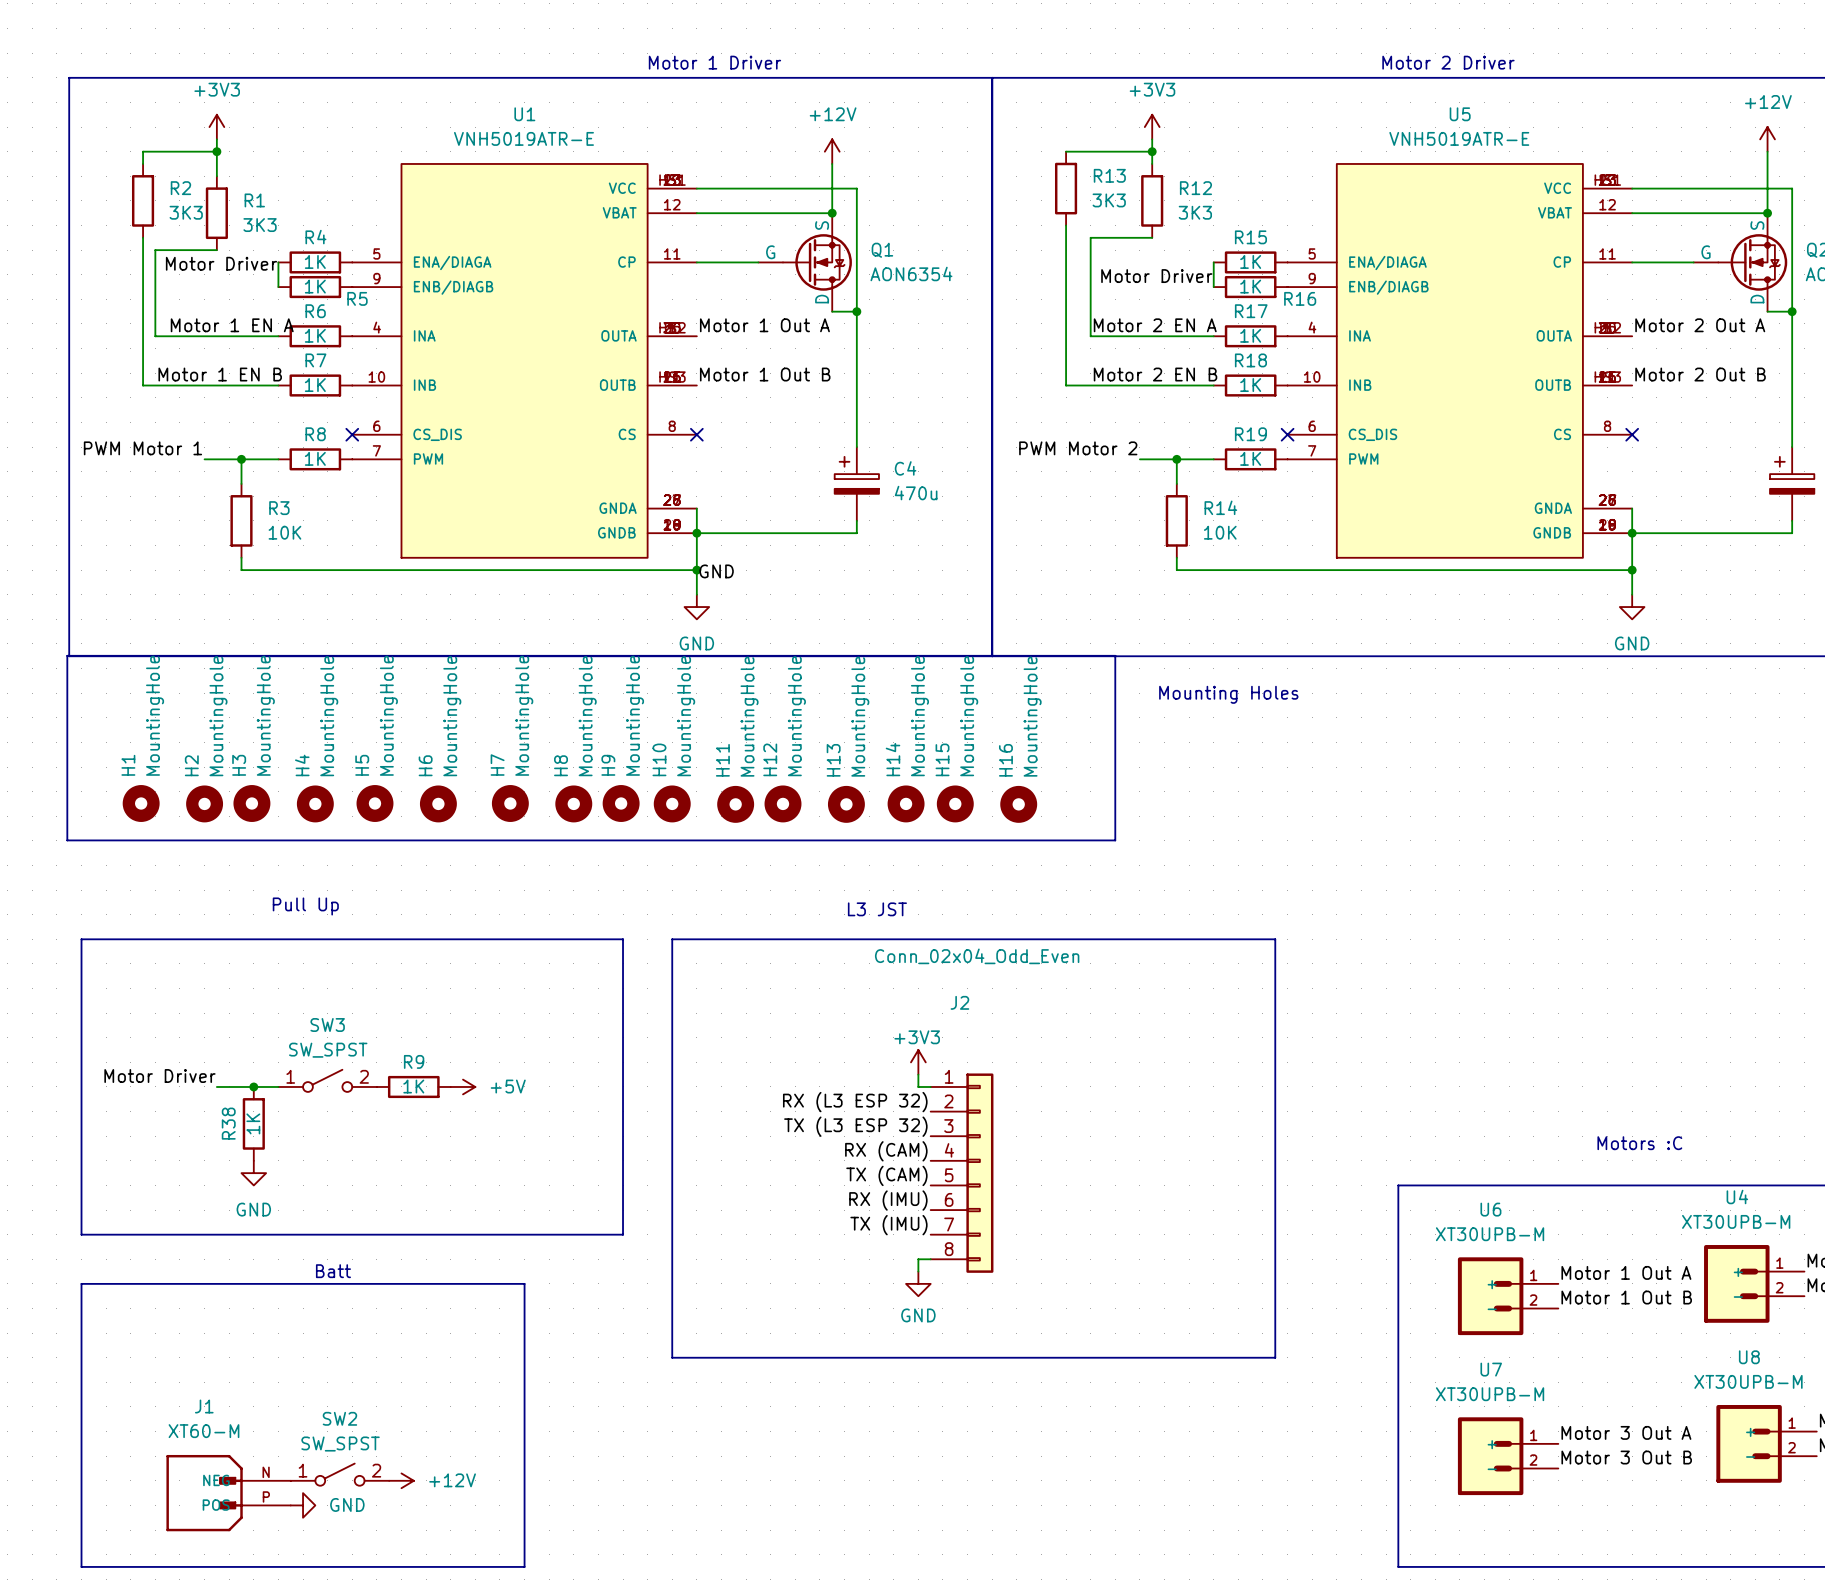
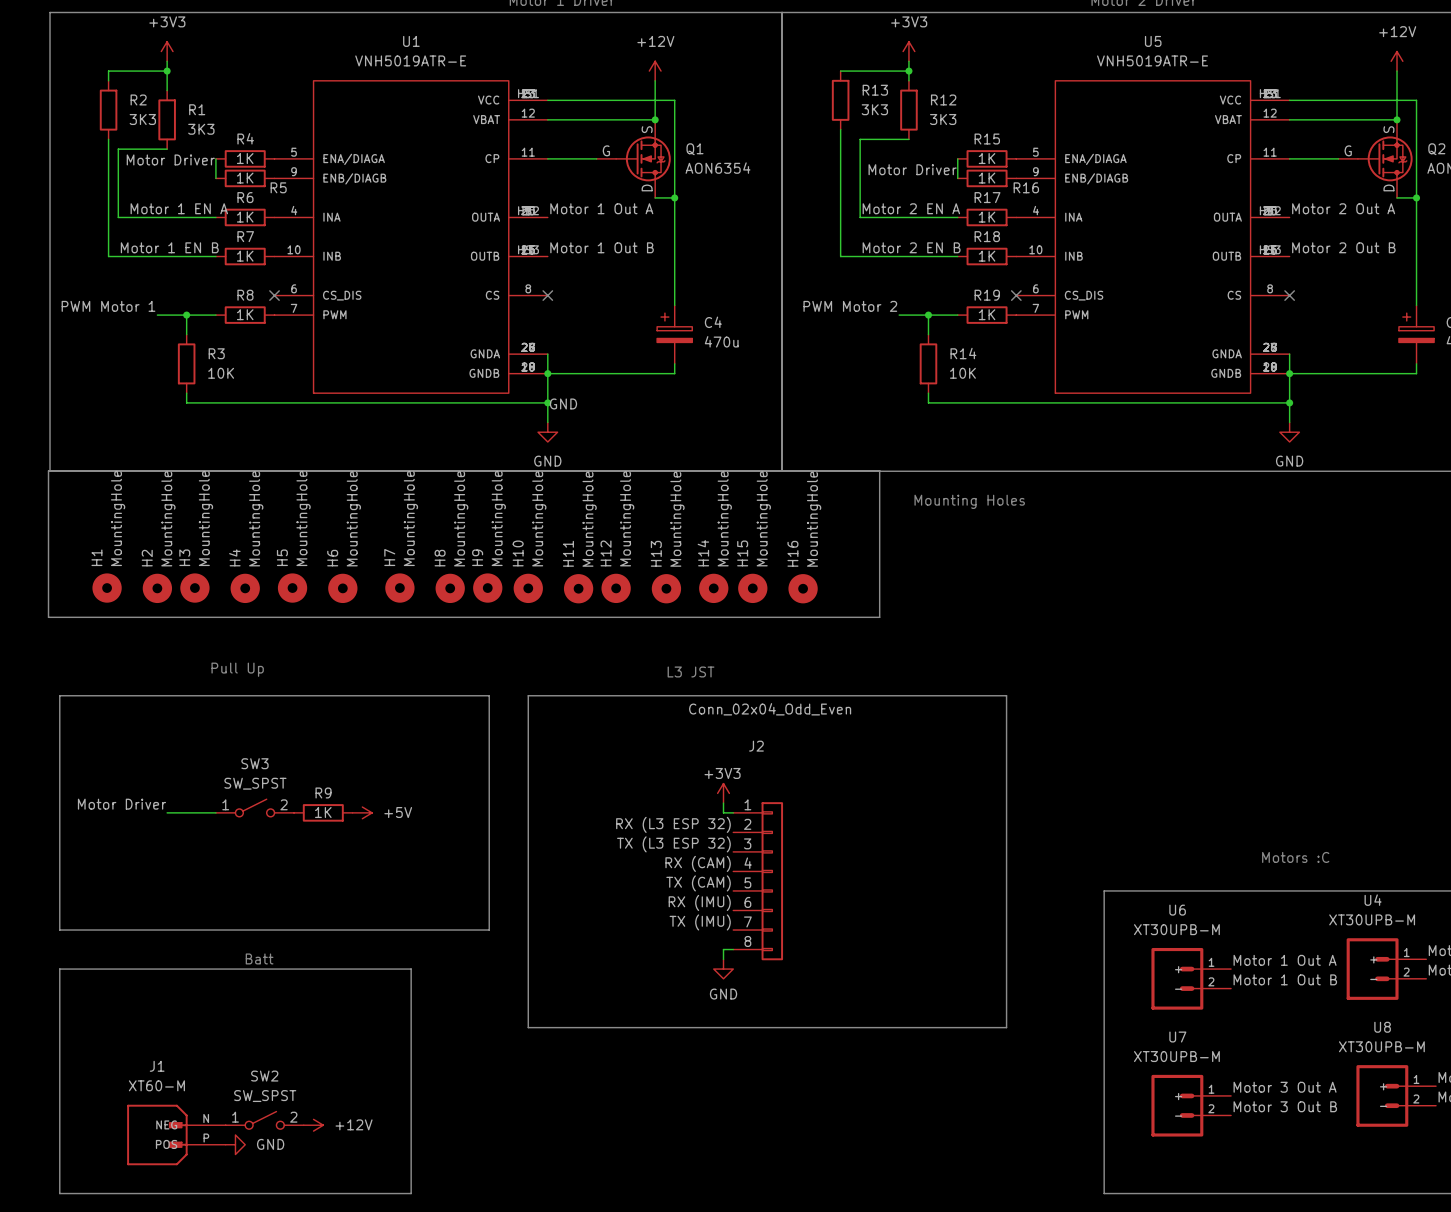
junction: (253, 1086) -> none
R38: 1K (253, 1123) -> none
power symbol: GND (253, 1173) -> none

